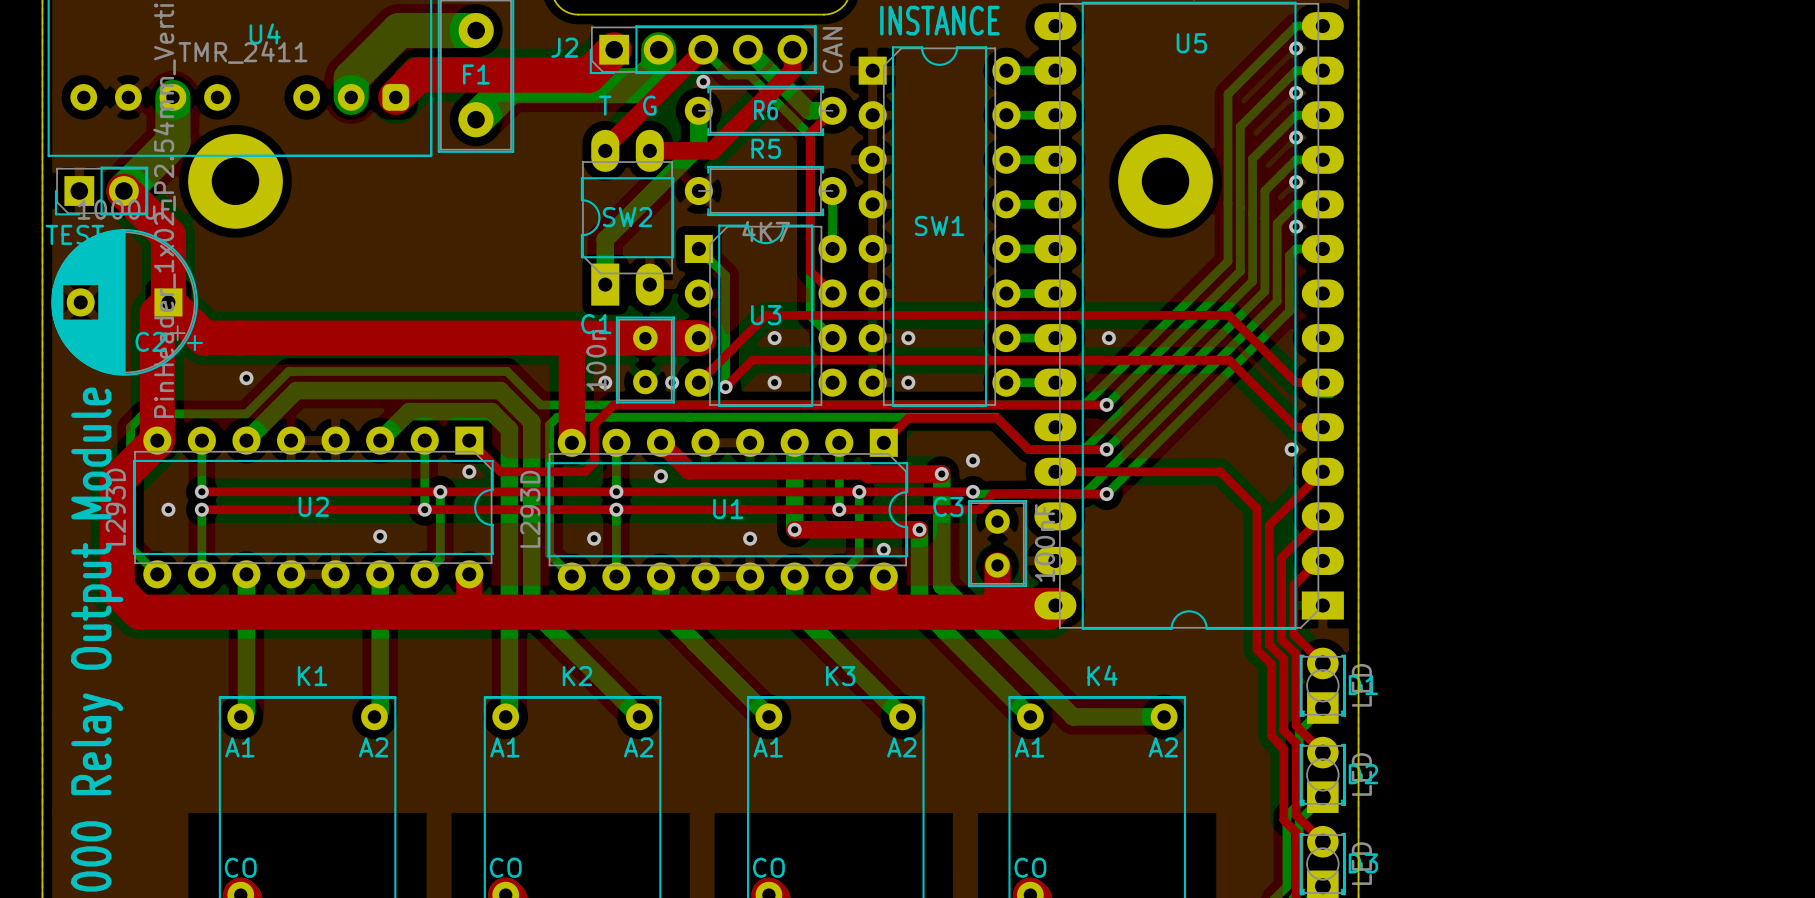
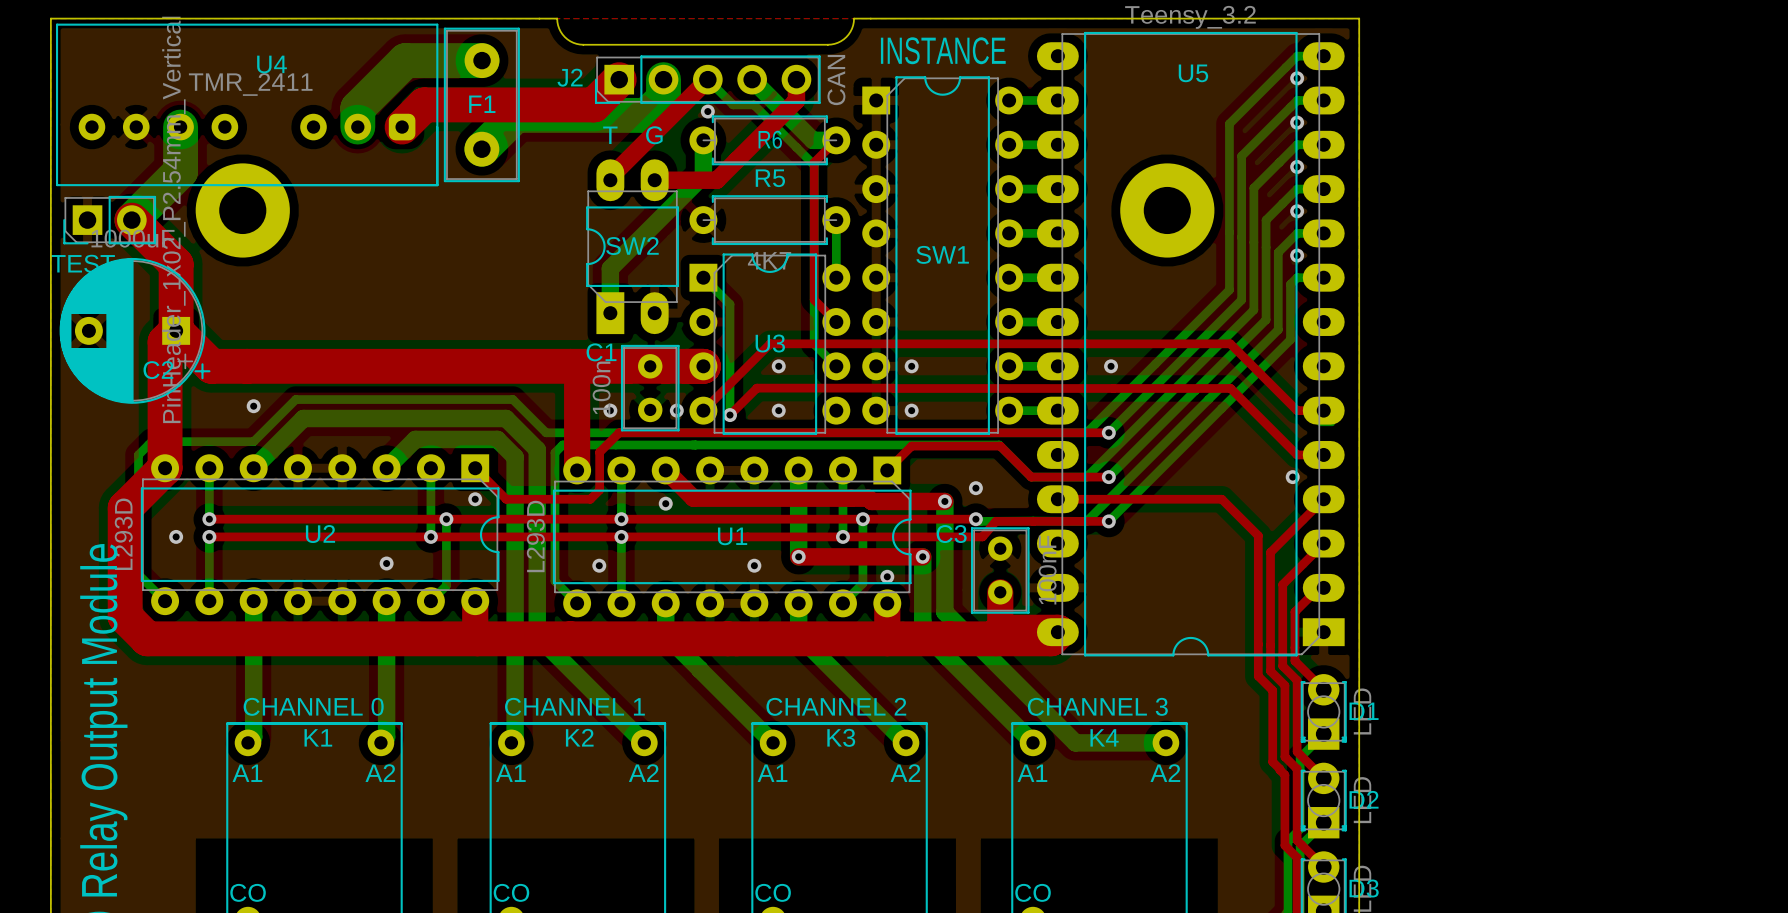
K4 name position: K4 (1102, 675) -> K4 (1104, 737)
K1 name position: K1 (312, 676) -> K1 (318, 737)
K2 name position: K2 (577, 676) -> K2 (579, 737)
K3 name position: K3 (840, 676) -> K3 (841, 737)
text: none -> CHANNEL 0 (313, 706)
text: none -> CHANNEL 1 (574, 706)
text: none -> CHANNEL 2 (836, 706)
text: none -> CHANNEL 3 (1097, 706)

